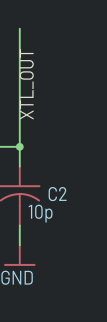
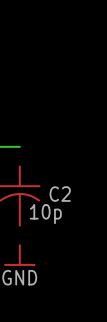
wire: (19, 28) (19, 166) -> none
label: XTL_OUT (26, 84) -> none
junction: (19, 146) -> none
wire: (19, 225) (19, 245) -> none

